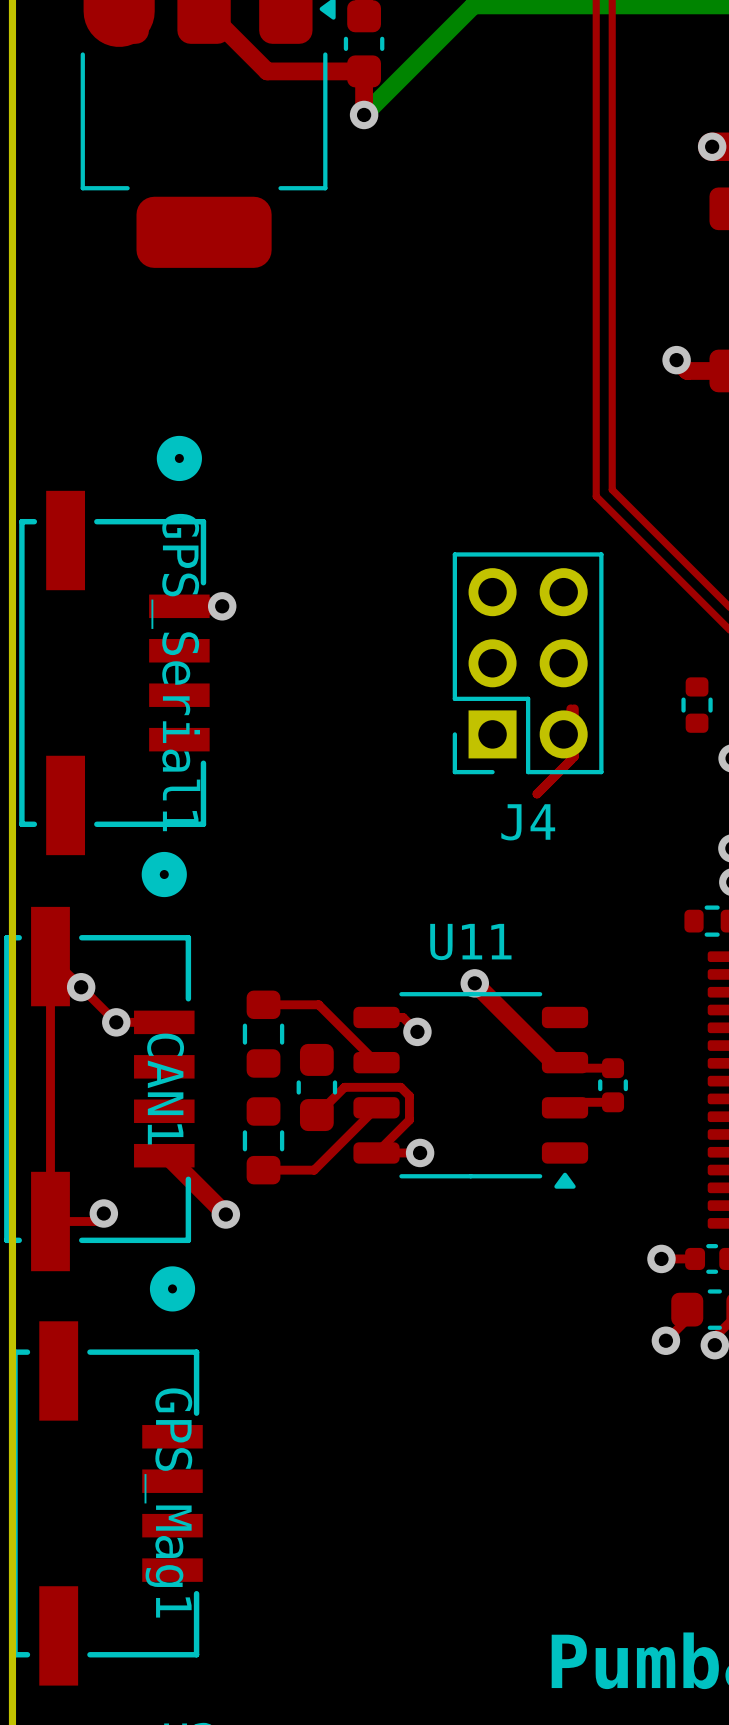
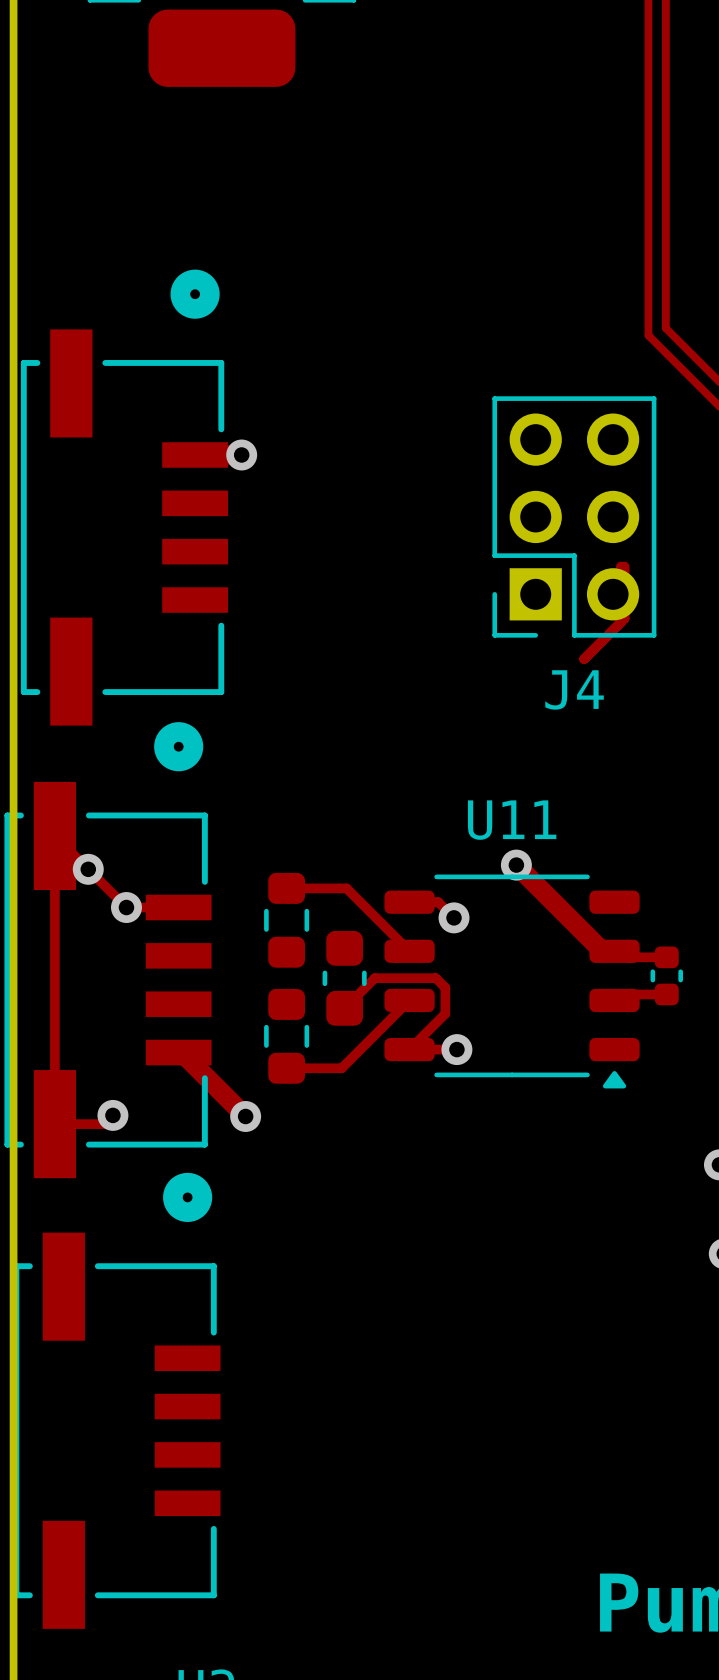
GPS_Serial1 name: GPS_Serial1 (175, 672) -> none
CAN1 name: CAN1 (165, 1089) -> none
GPS_Mag1 name: GPS_Mag1 (168, 1503) -> none

